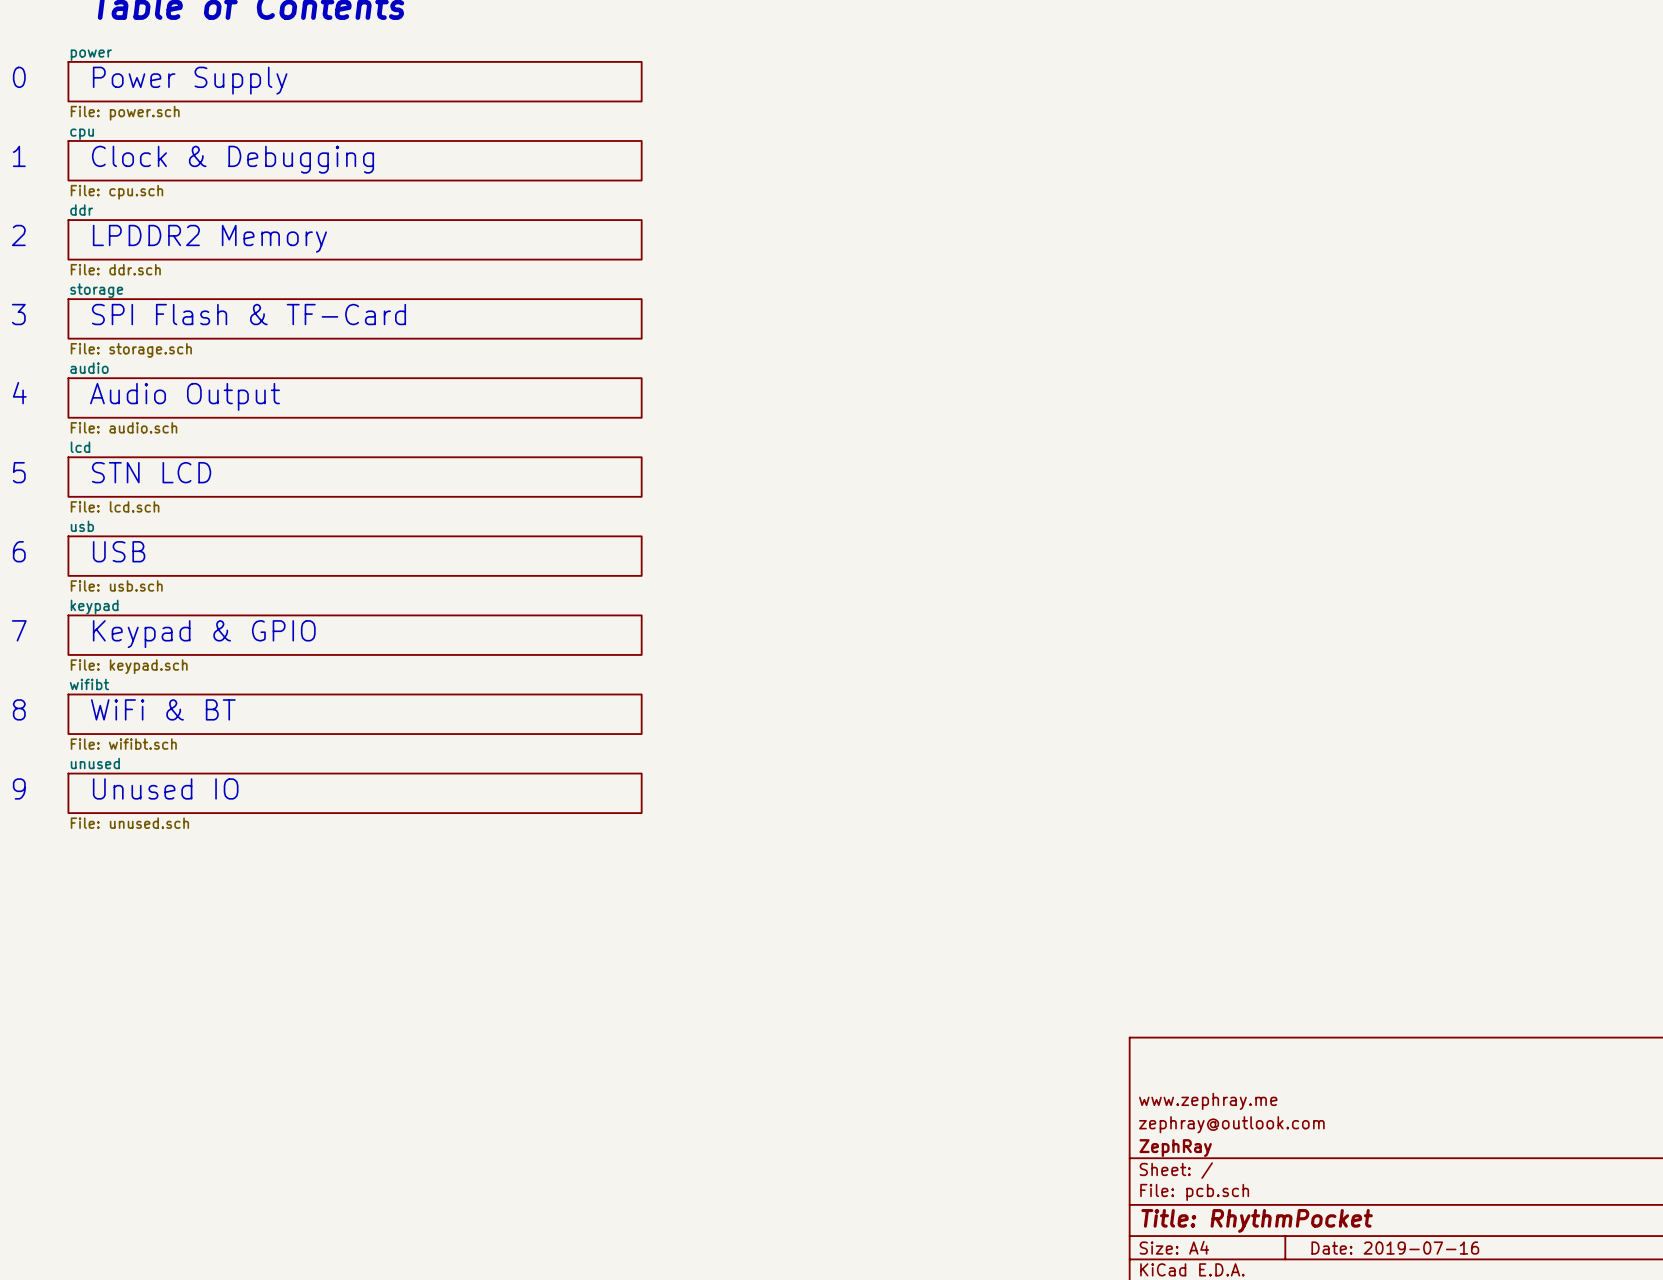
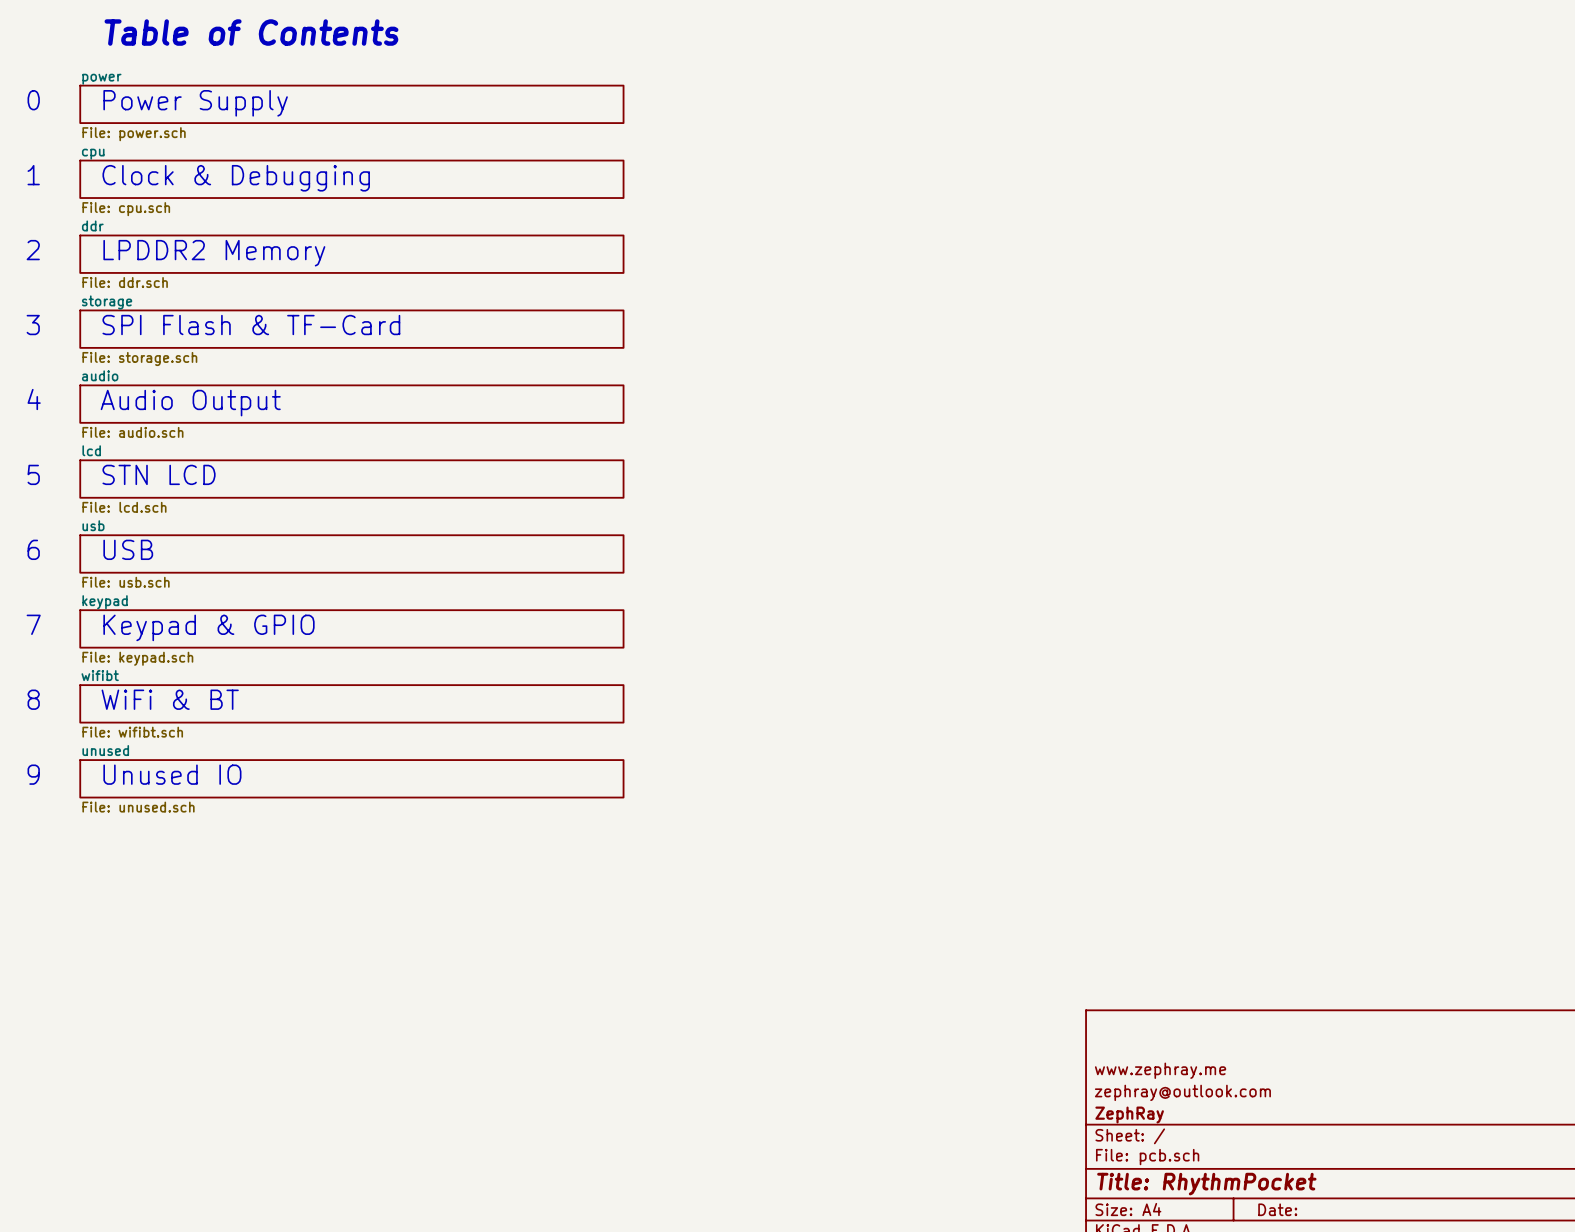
title block: Date: 2019-07-16 (1395, 1248) -> Date: (1277, 1209)

